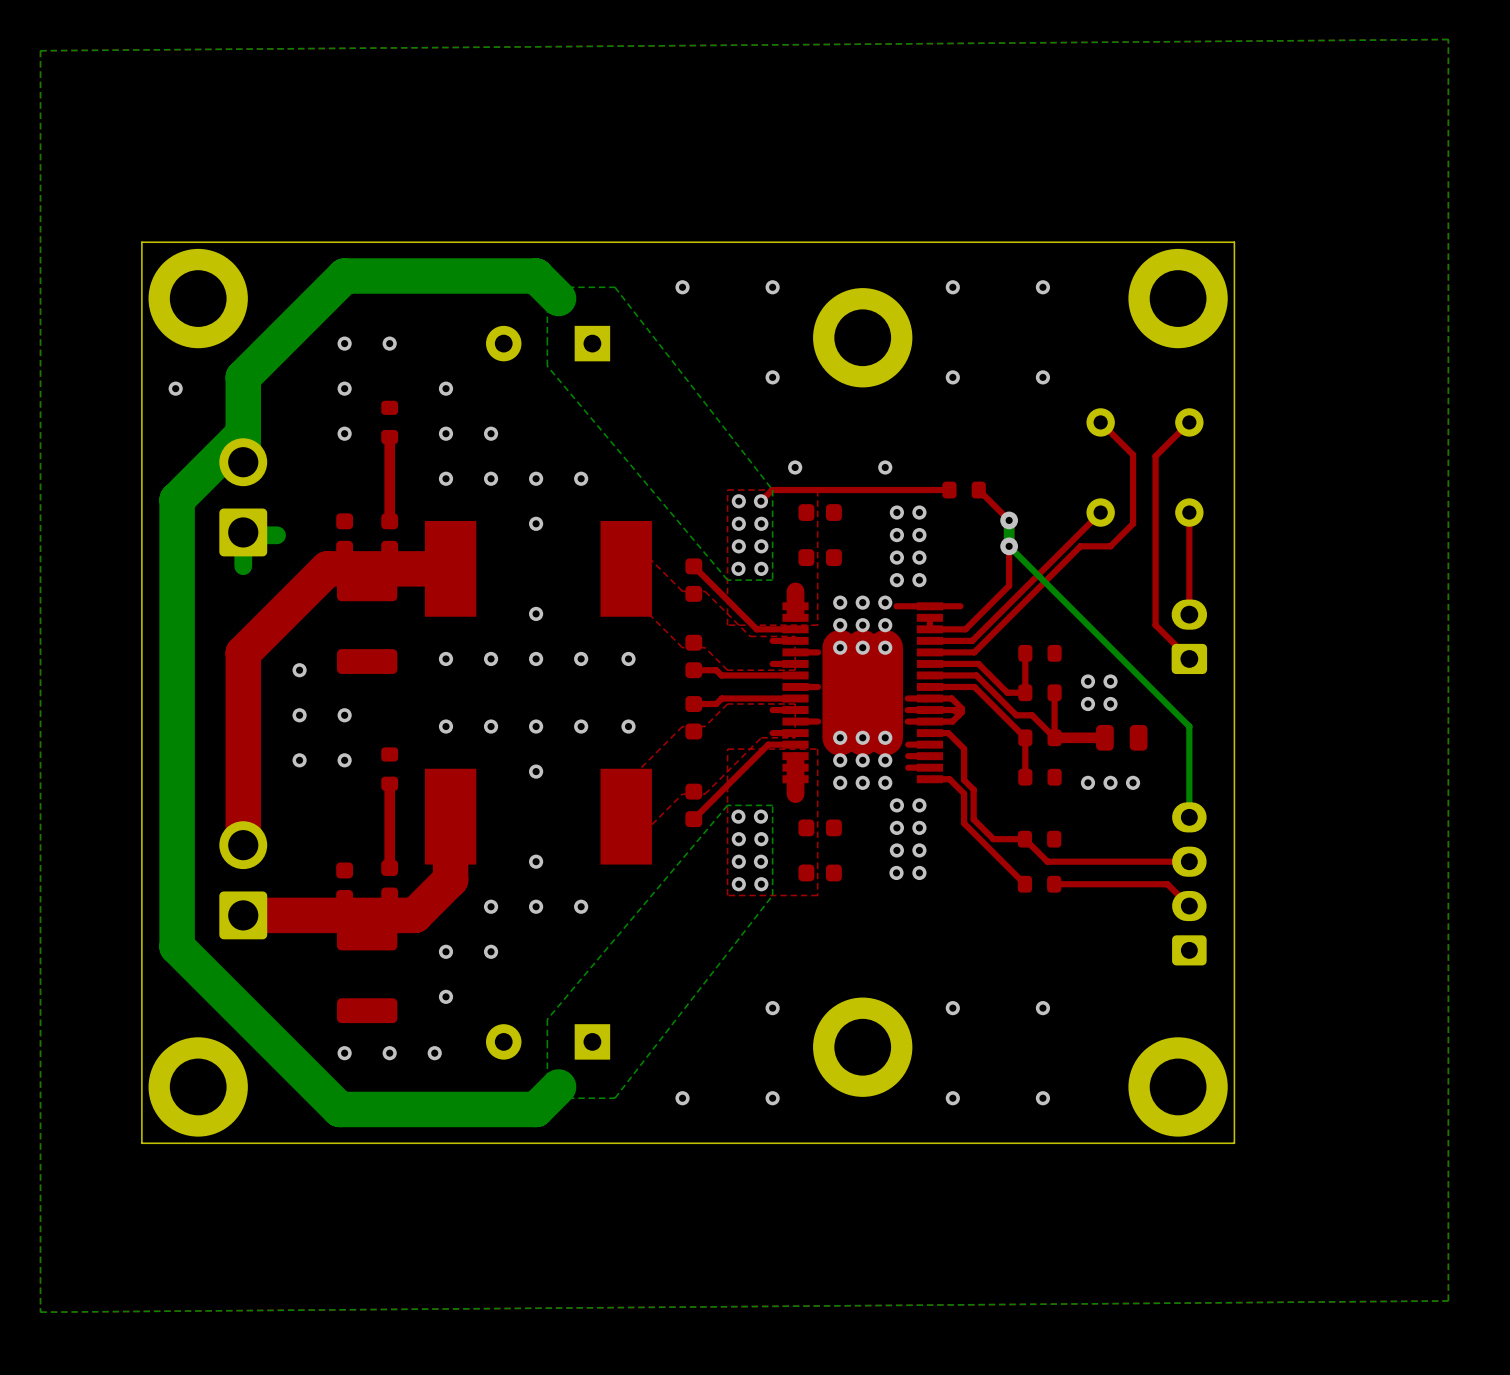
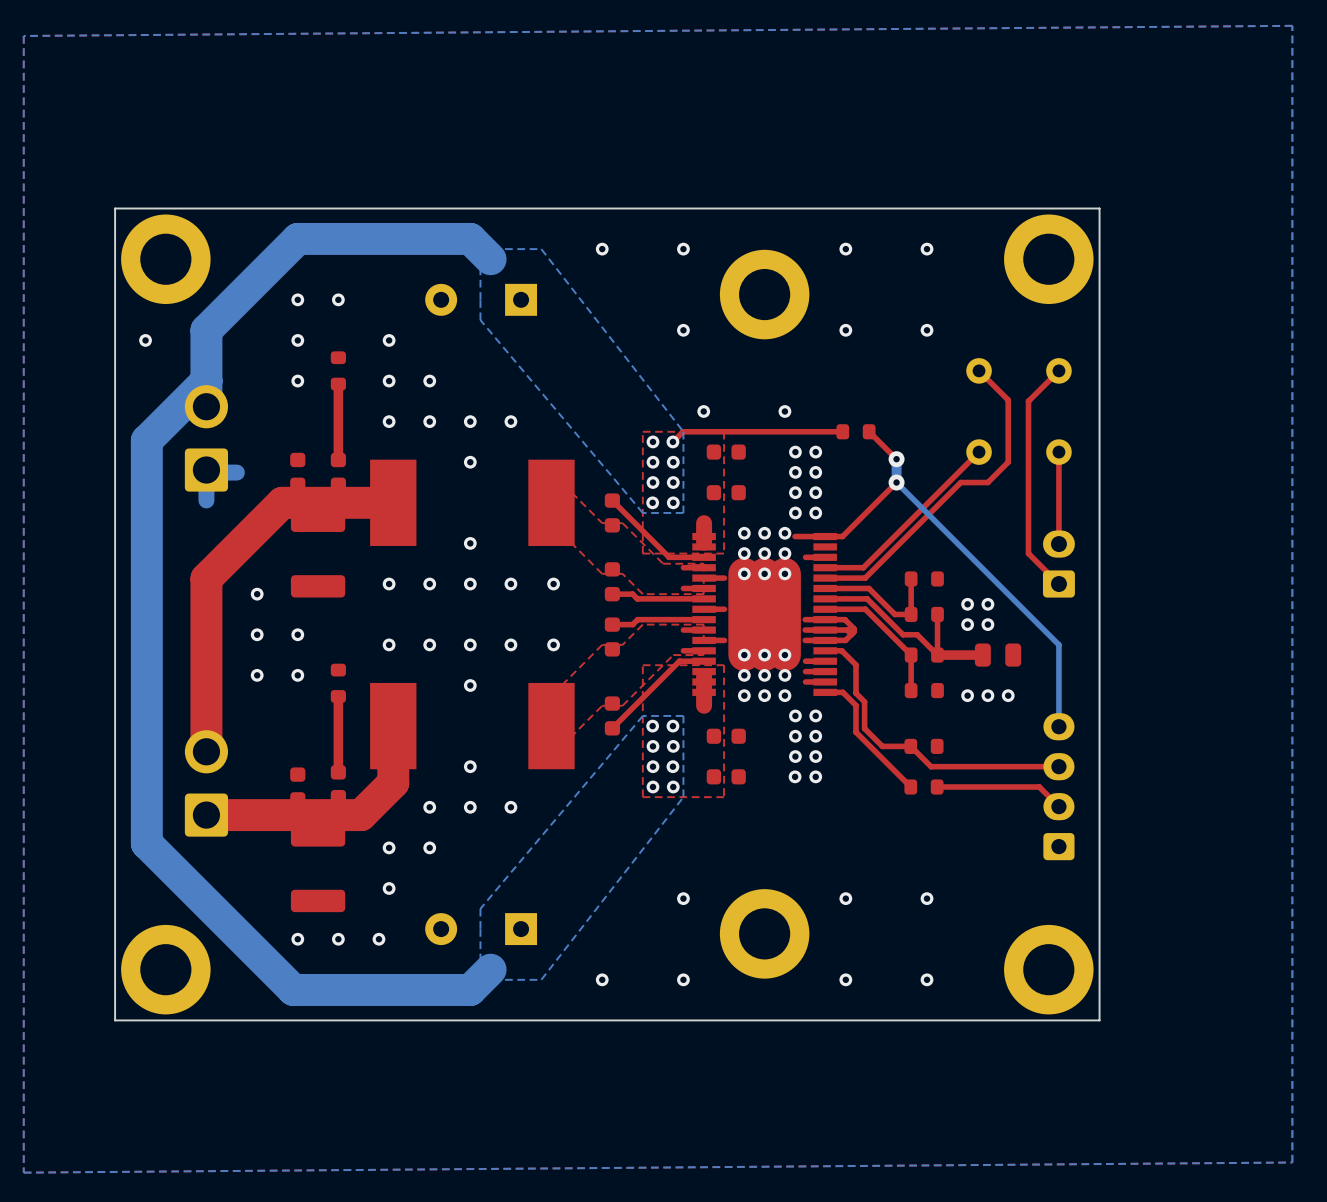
top track: (1009, 546) (1009, 585) (965, 629) (929, 629) (929, 617) -> (896, 482) (842, 536)
top track: (960, 606) (949, 606) -> none
top track: none -> (825, 557) (805, 557)

